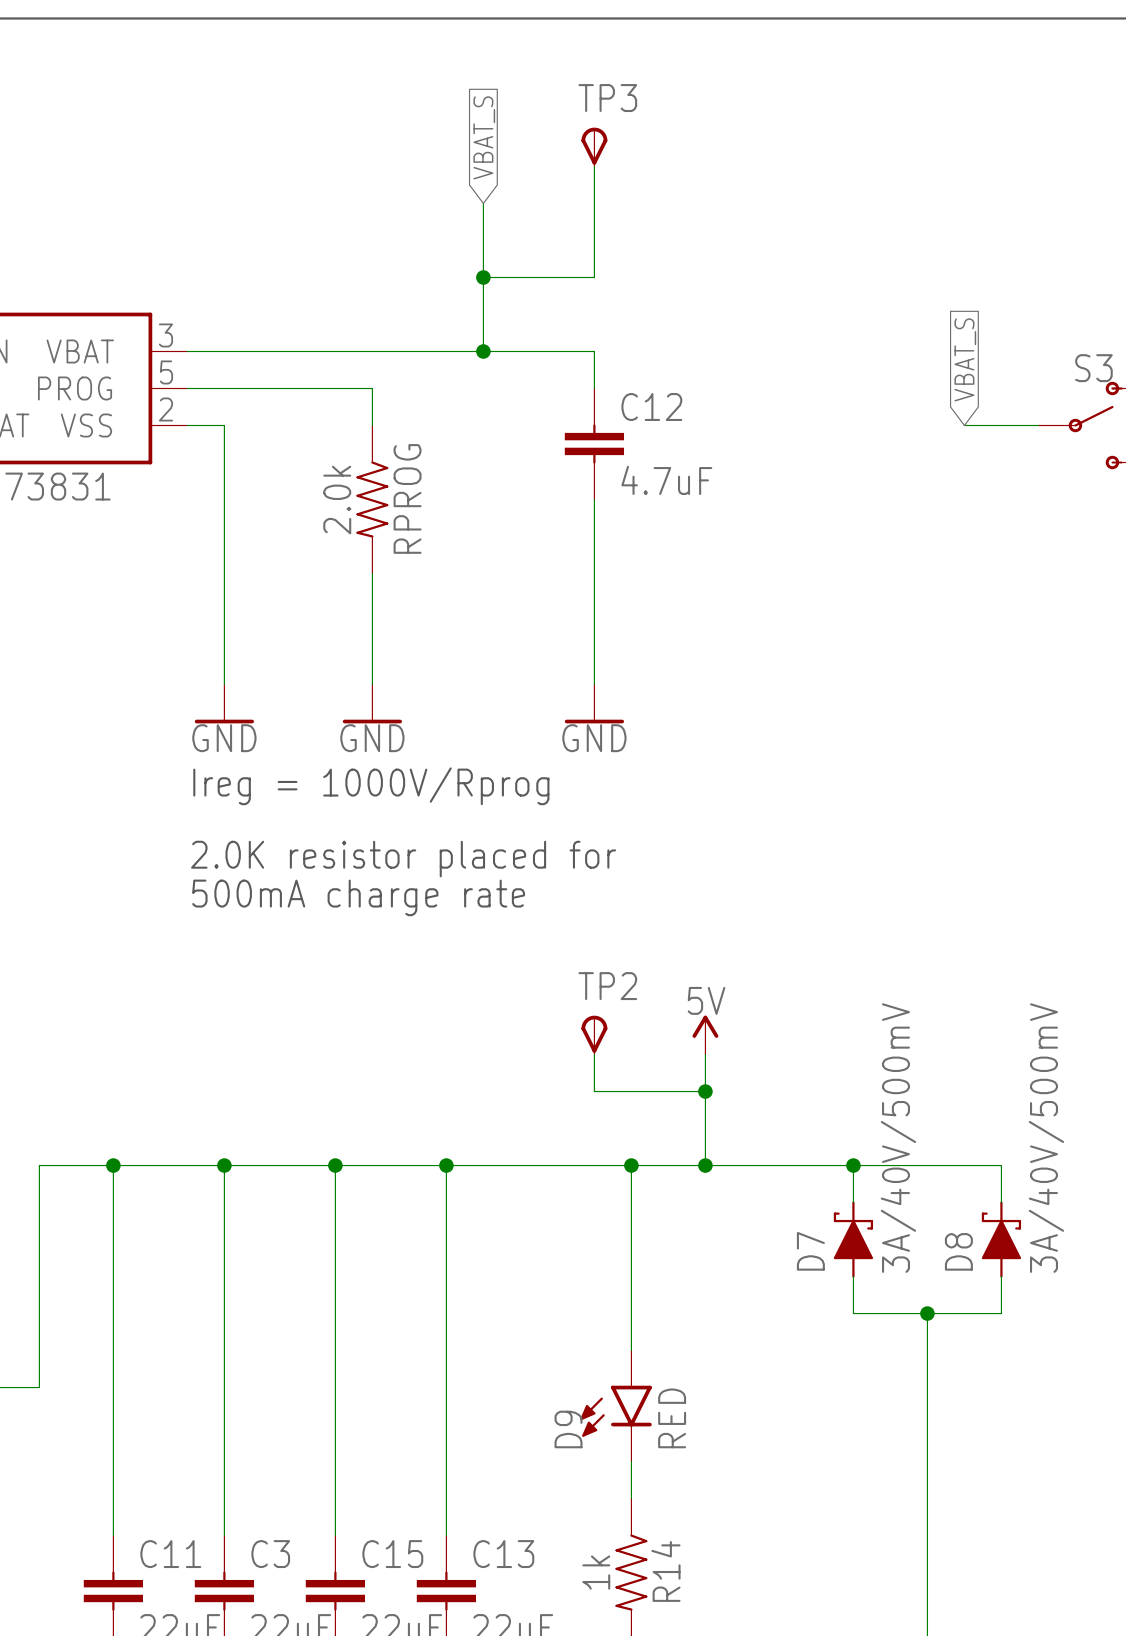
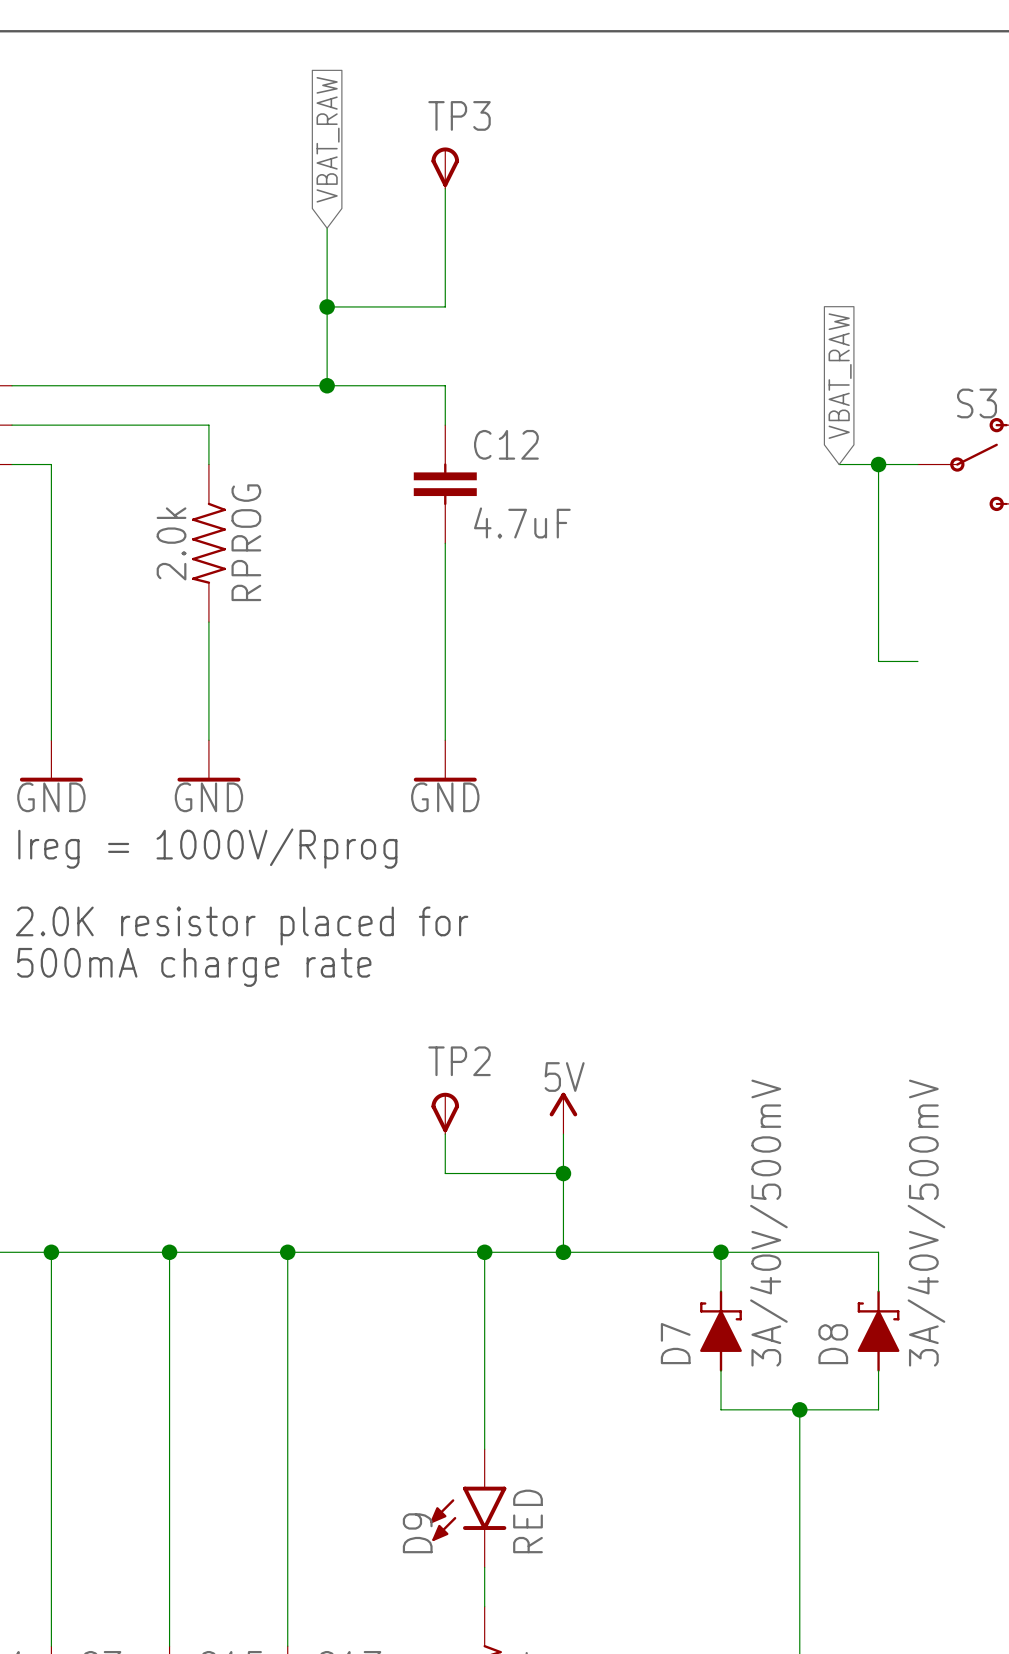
global label: VBAT_S (484, 137) -> VBAT_RAW (328, 139)
global label: VBAT_S (965, 359) -> VBAT_RAW (840, 376)
wire: none -> (878, 464) (878, 661) (917, 661)
junction: none -> (878, 464)

